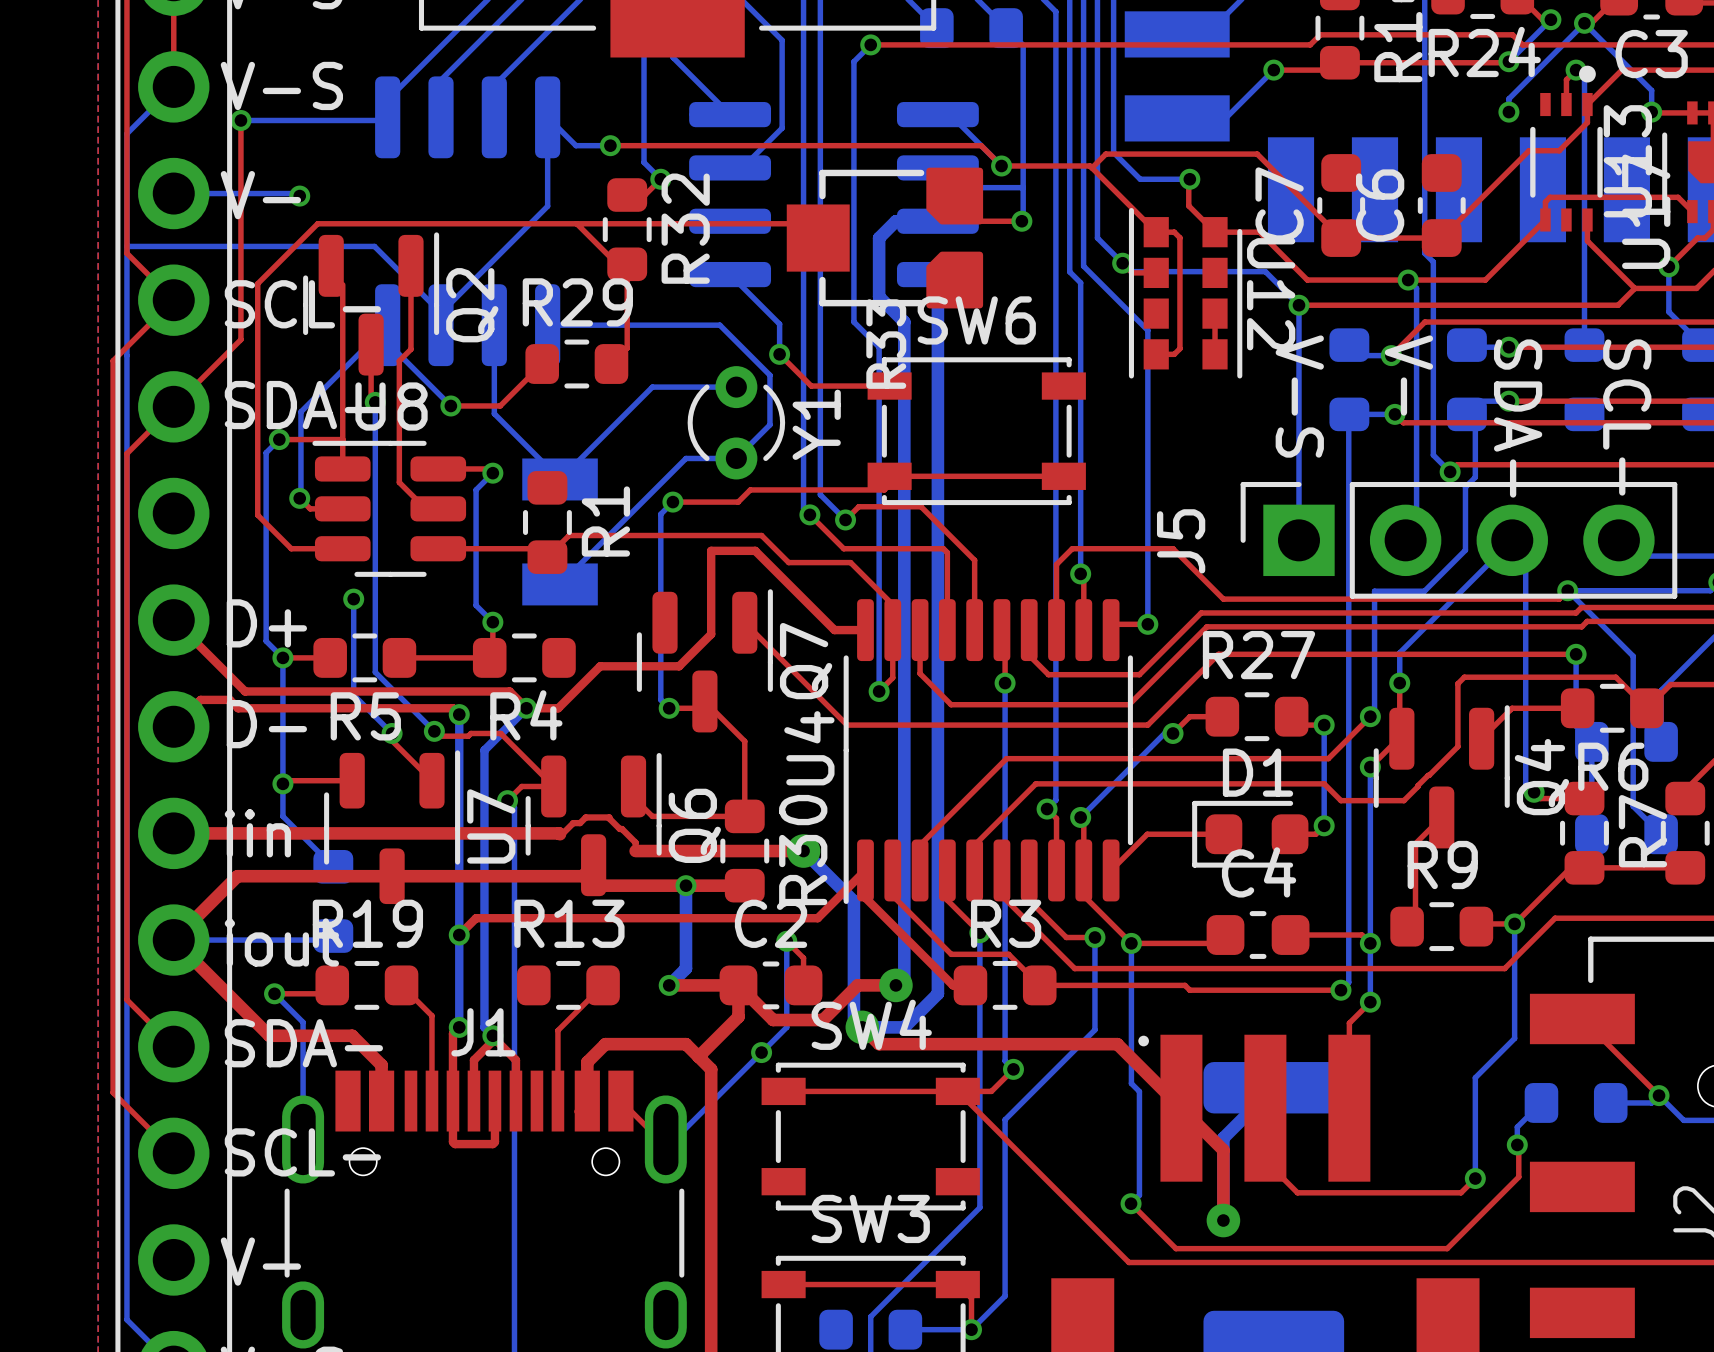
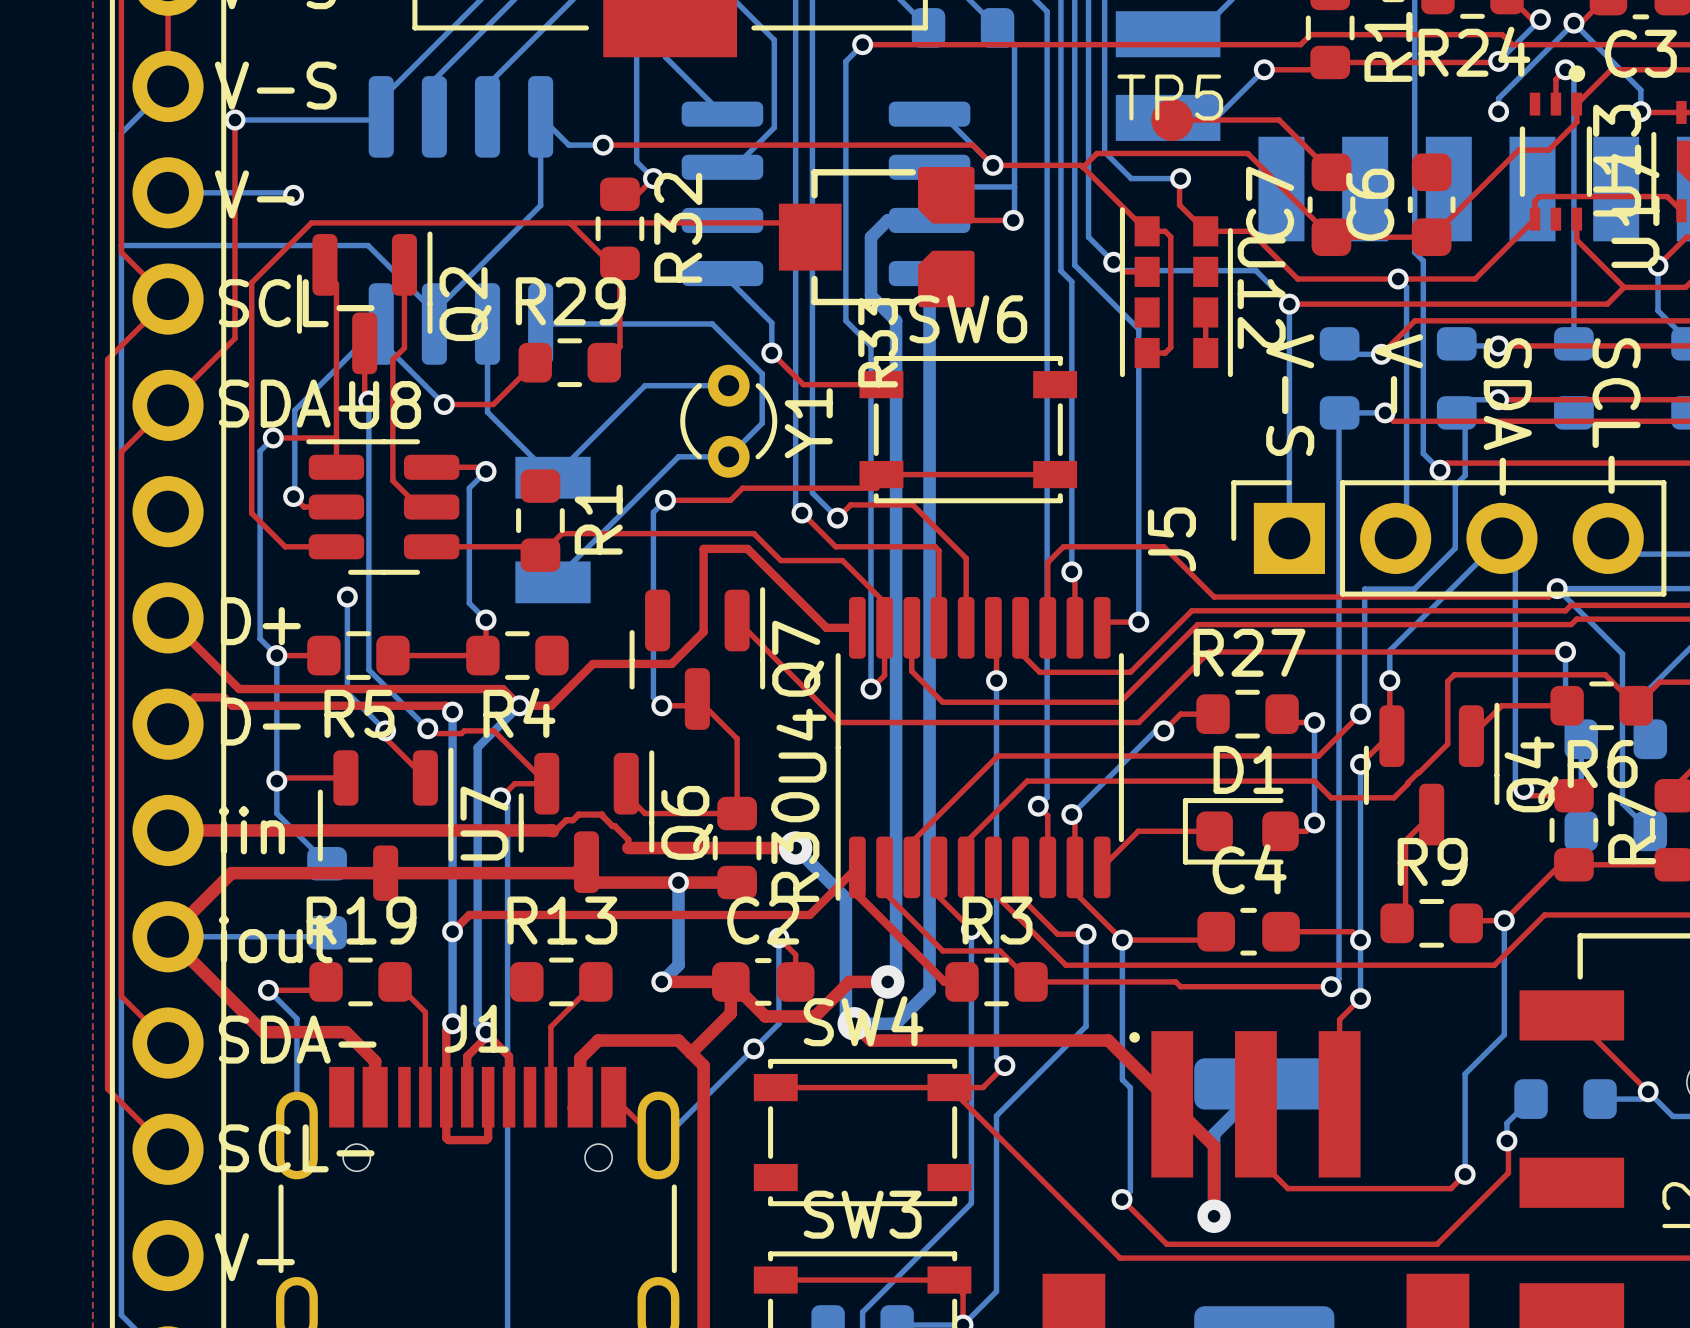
top track: none -> (1172, 120) (1279, 120) (1331, 172)
TP5: none -> (1172, 120)

